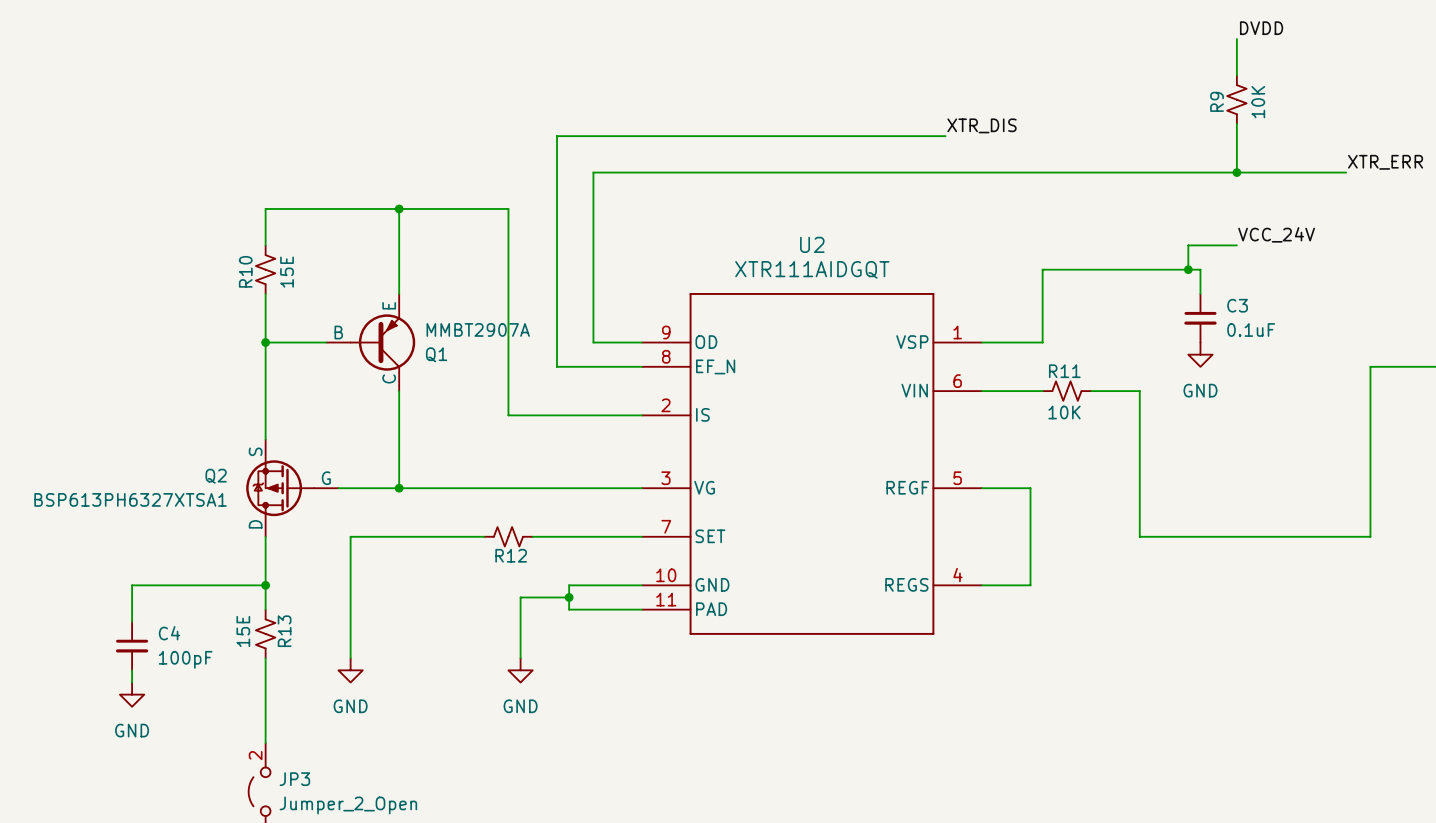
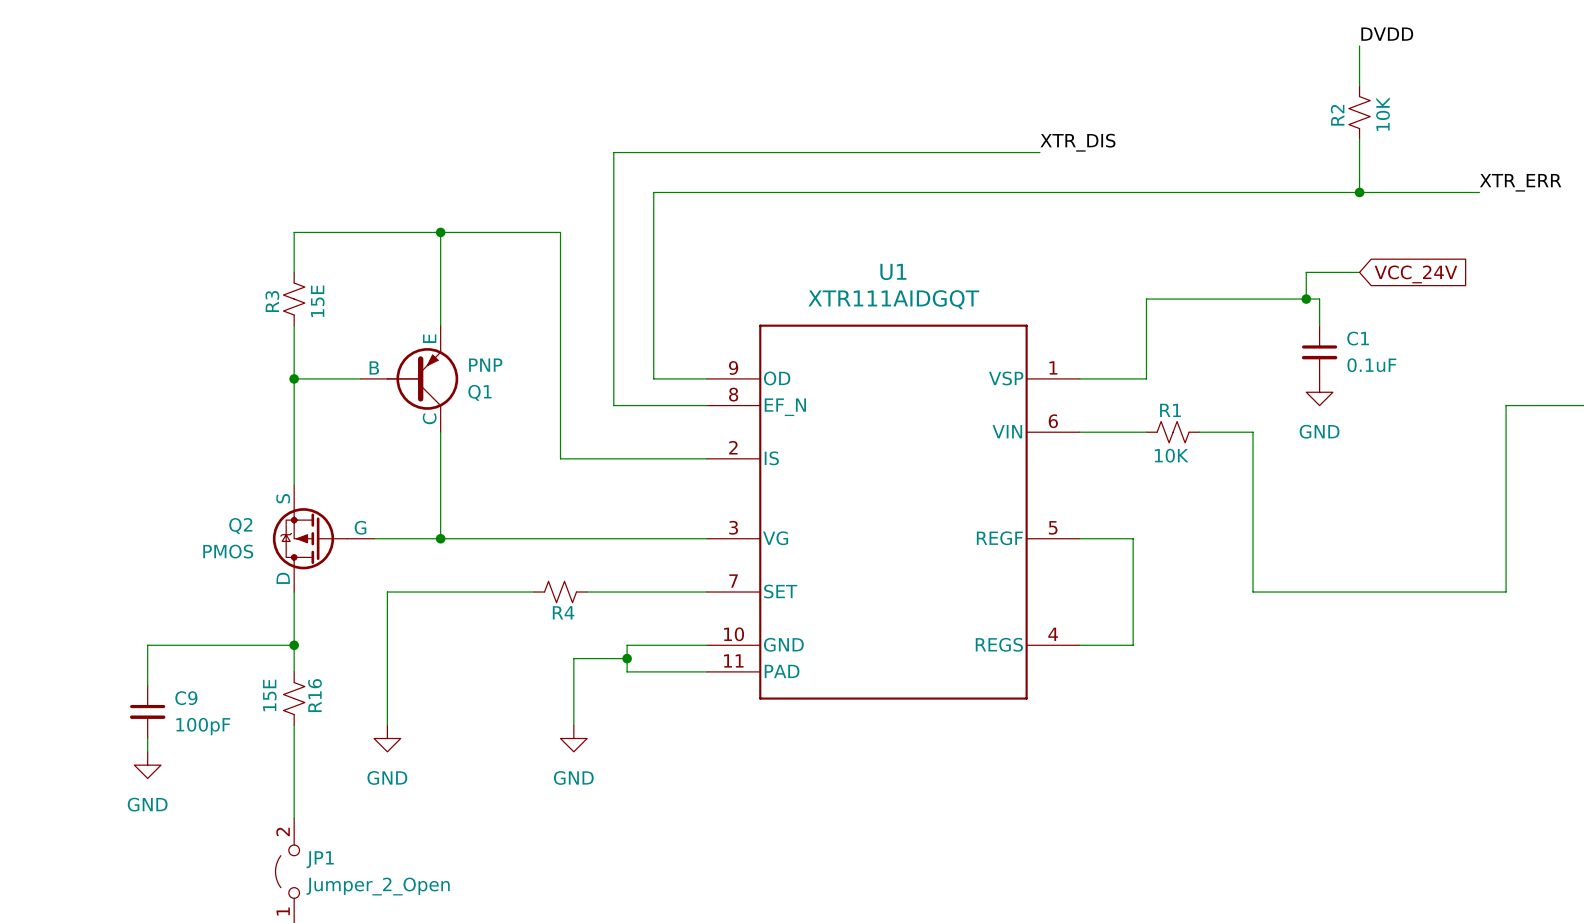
R9 name: R9 (1217, 101) -> R2 (1337, 115)
label: VCC_24V (1276, 234) -> none
U2 name: U2 (812, 244) -> U1 (893, 271)
global label: none -> VCC_24V (1415, 274)
R10 name: R10 (245, 271) -> R3 (272, 301)
C3 name: C3 (1237, 305) -> C1 (1358, 338)
Q1 value: MMBT2907A (478, 329) -> PNP (485, 365)
R11 name: R11 (1064, 371) -> R1 (1170, 410)
Q2 value: BSP613PH6327XTSA1 (130, 499) -> PMOS (228, 551)
R12 name: R12 (511, 555) -> R4 (563, 612)
R13 name: R13 (284, 631) -> R16 (314, 695)
C4 name: C4 (169, 633) -> C9 (186, 698)
JP3 name: JP3 (294, 779) -> JP1 (320, 859)

